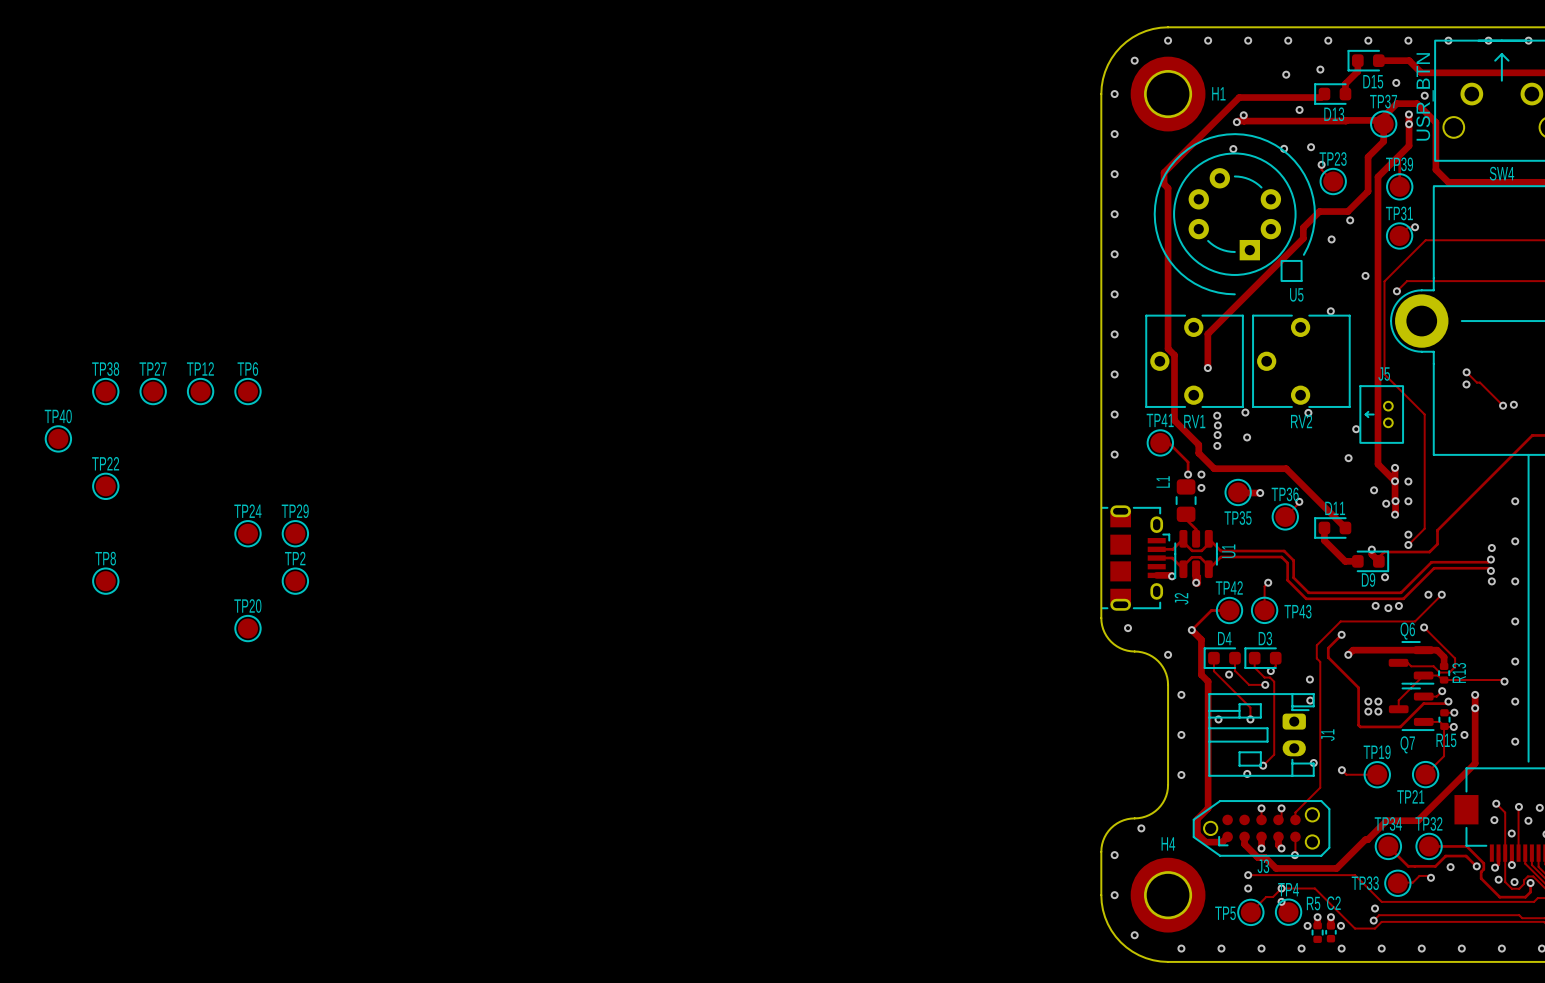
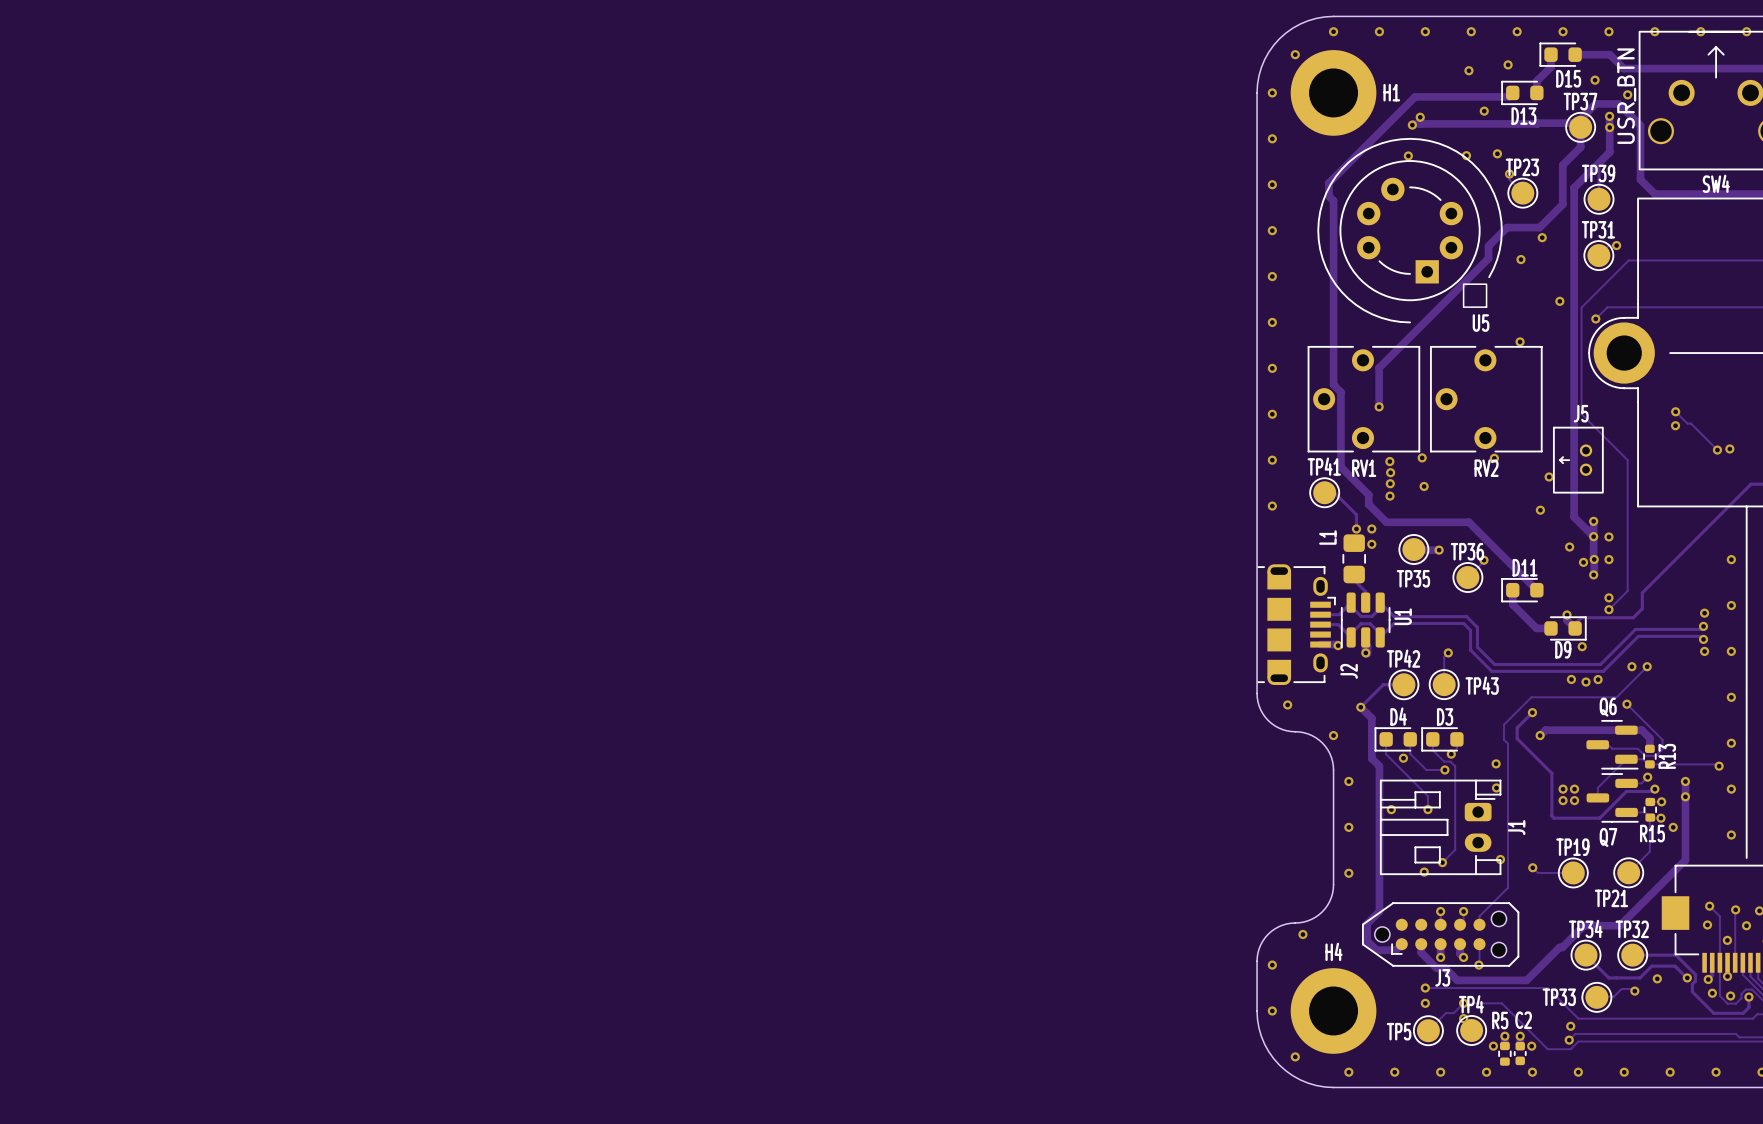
TP38: (105, 391) -> none
TP27: (153, 391) -> none
TP12: (200, 391) -> none
TP6: (247, 391) -> none
TP40: (58, 438) -> none
TP22: (105, 486) -> none
TP24: (247, 533) -> none
TP29: (295, 533) -> none
TP8: (105, 581) -> none
TP2: (295, 581) -> none
TP20: (247, 628) -> none

